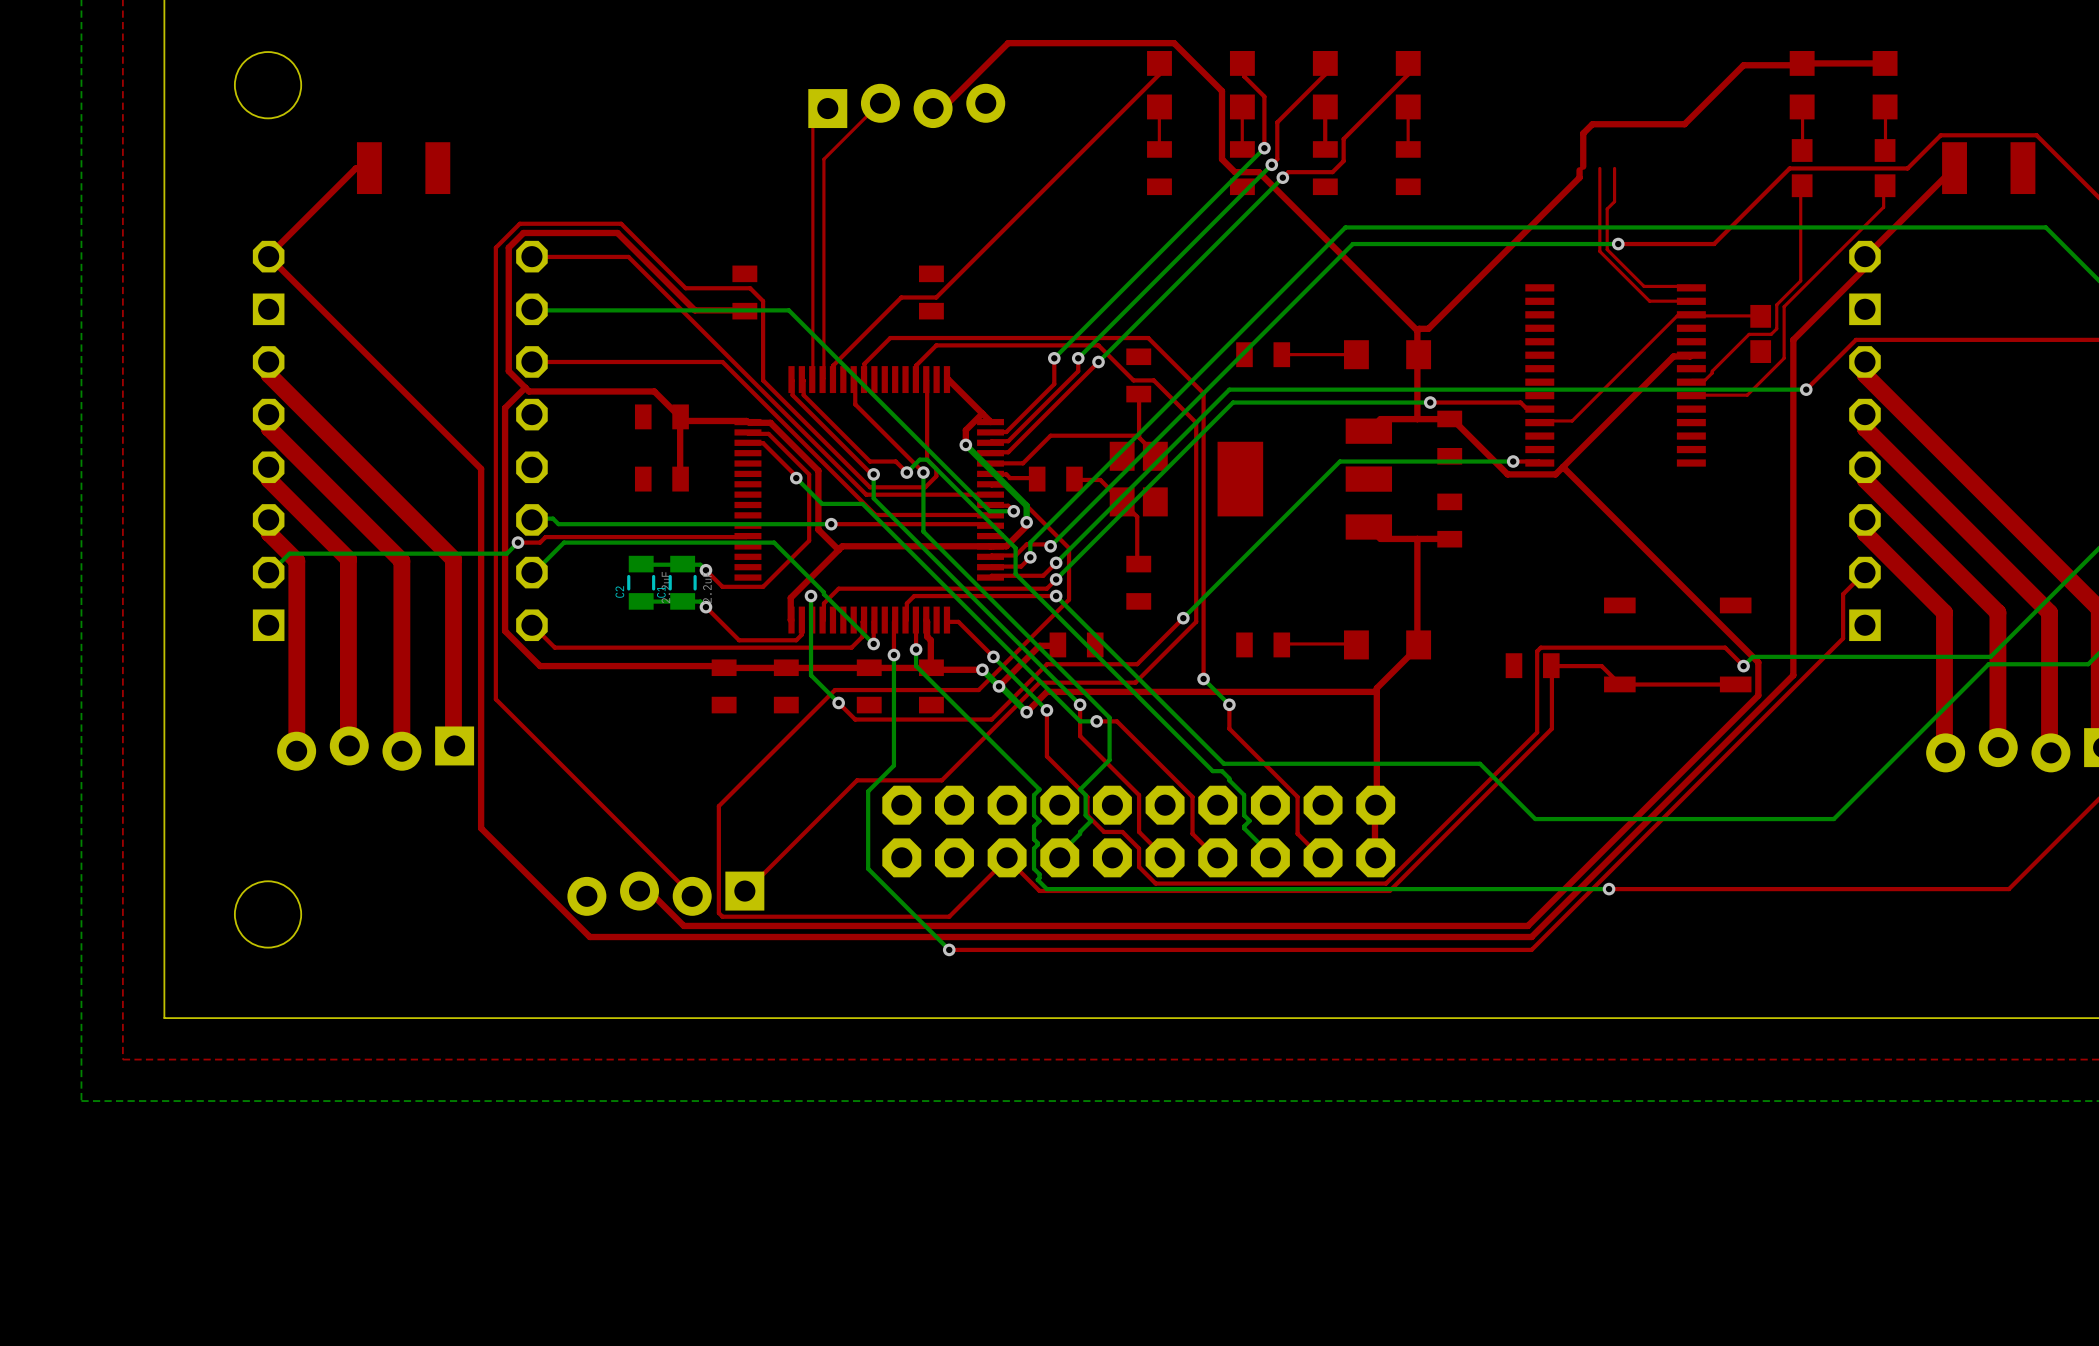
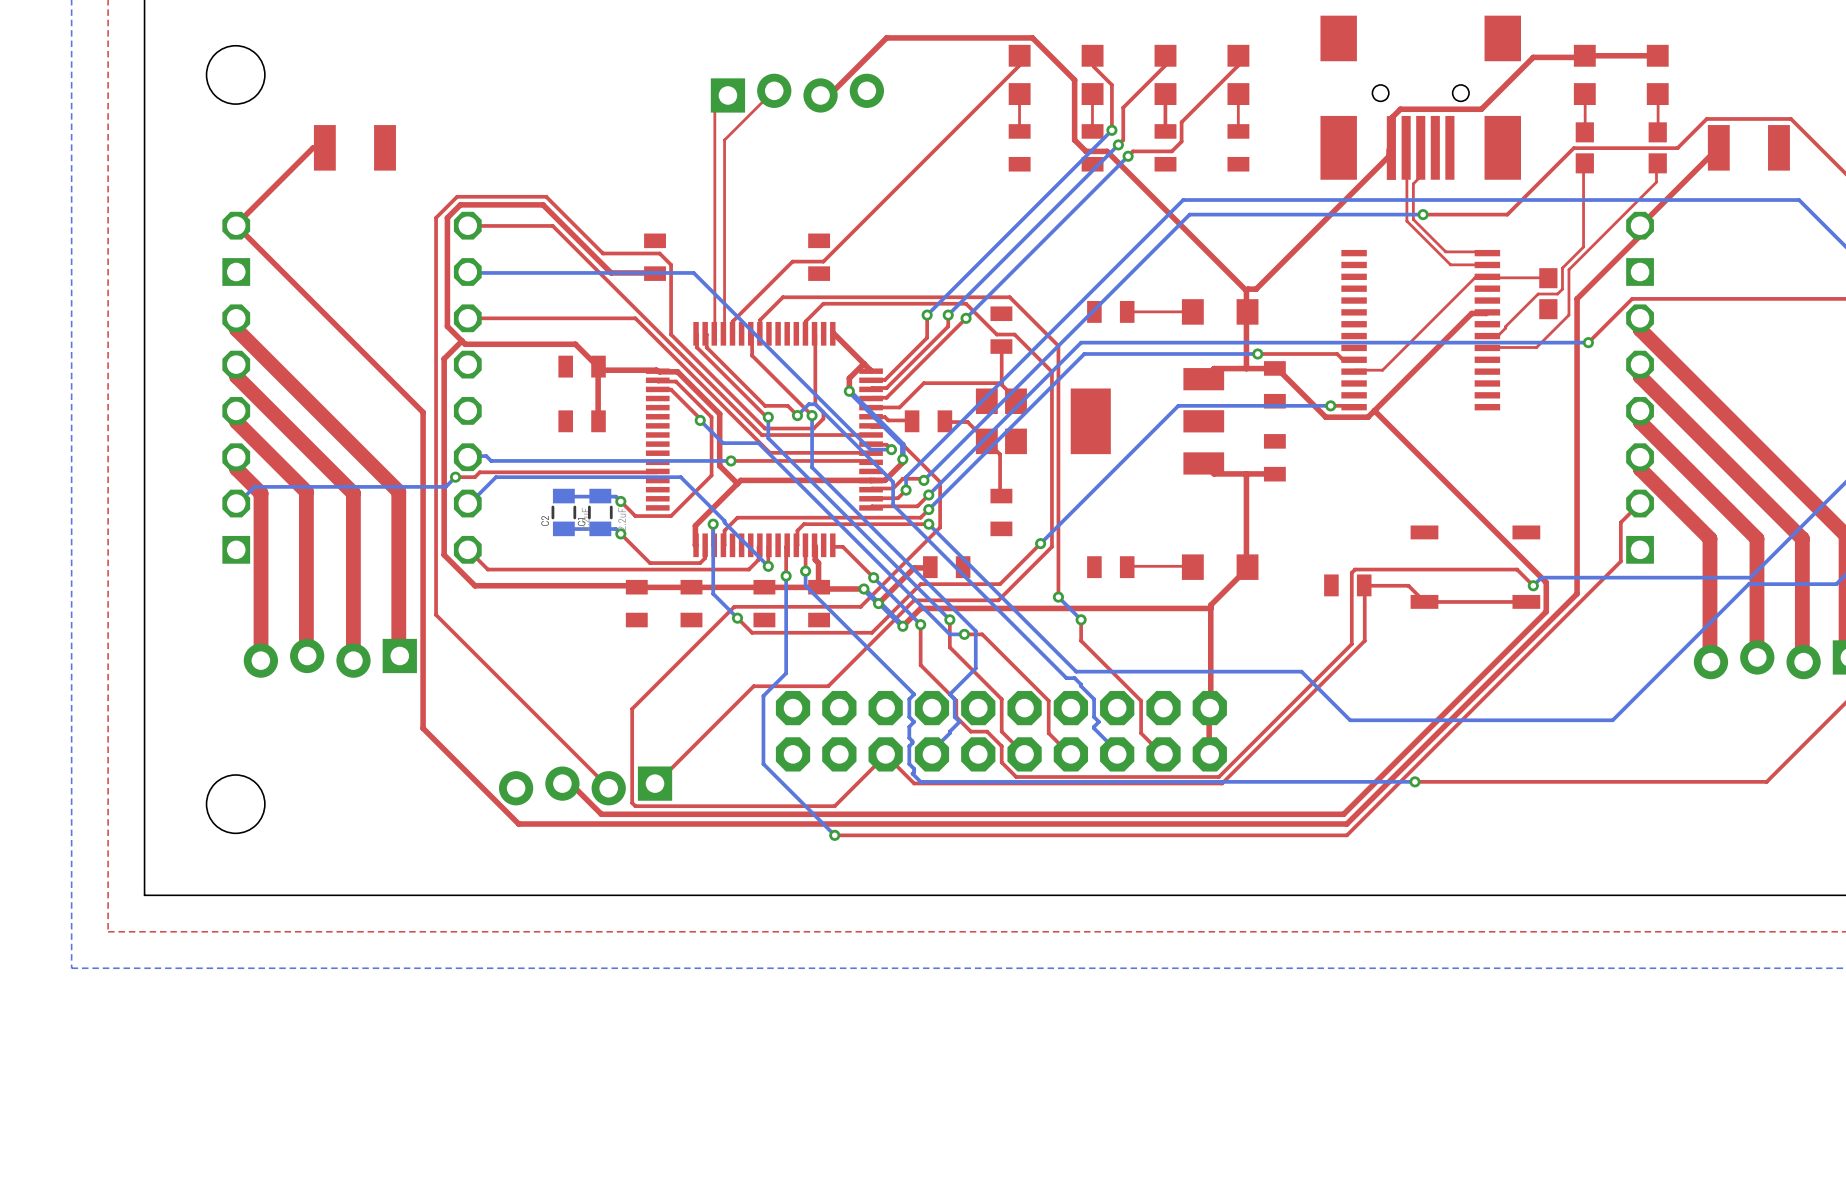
part: none -> (1420, 97)

